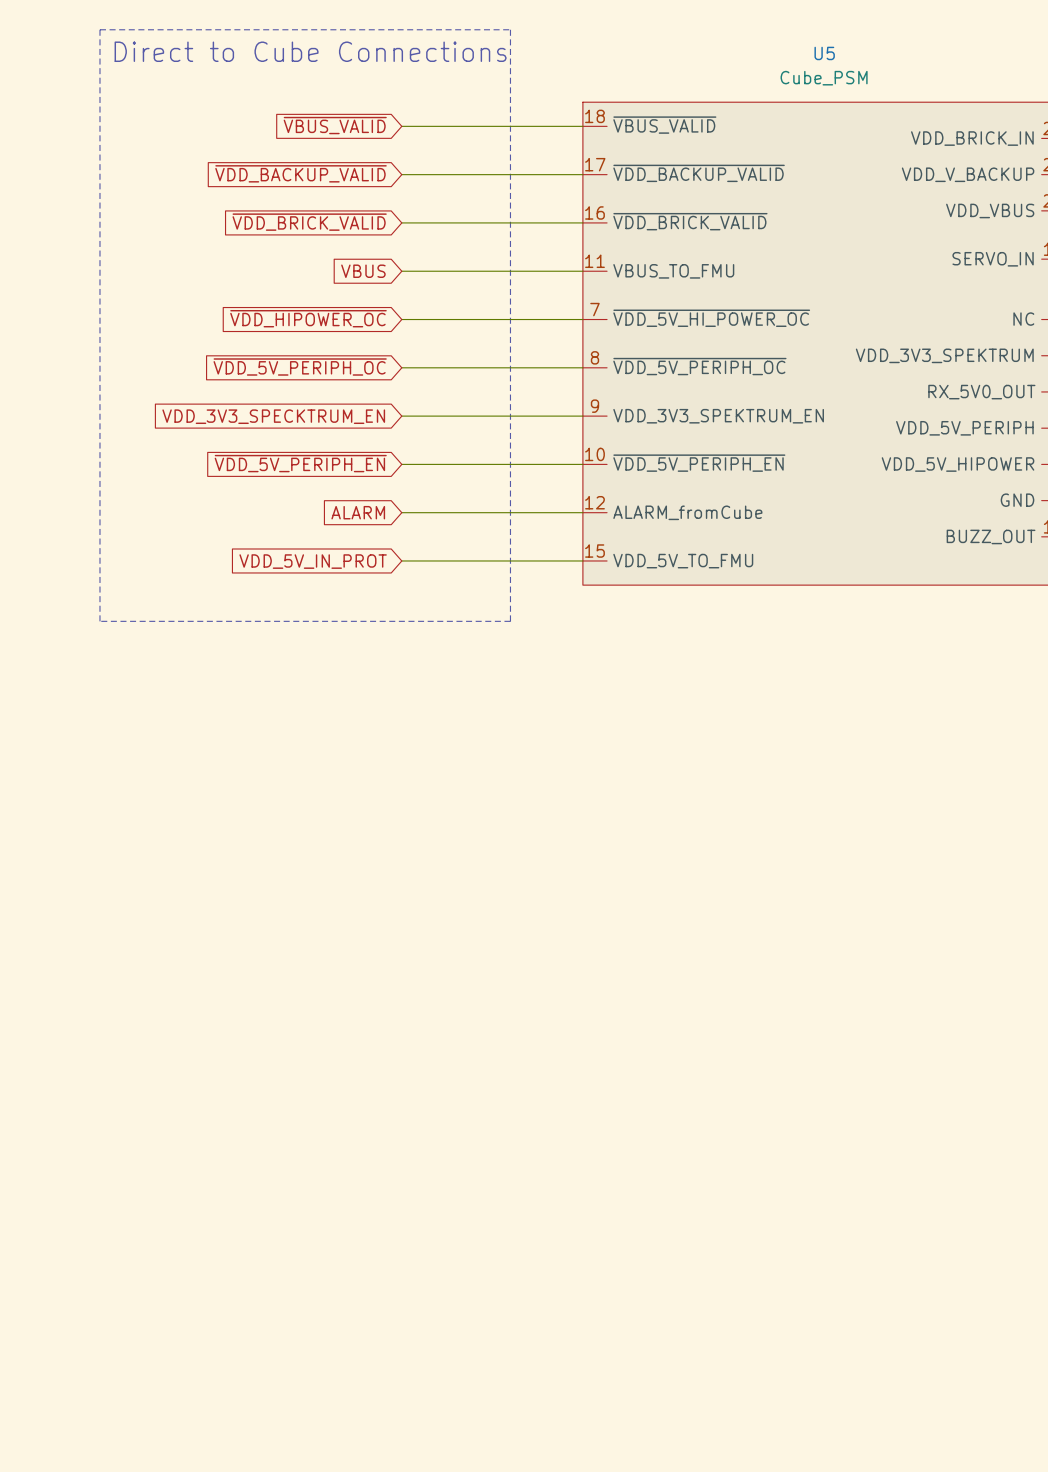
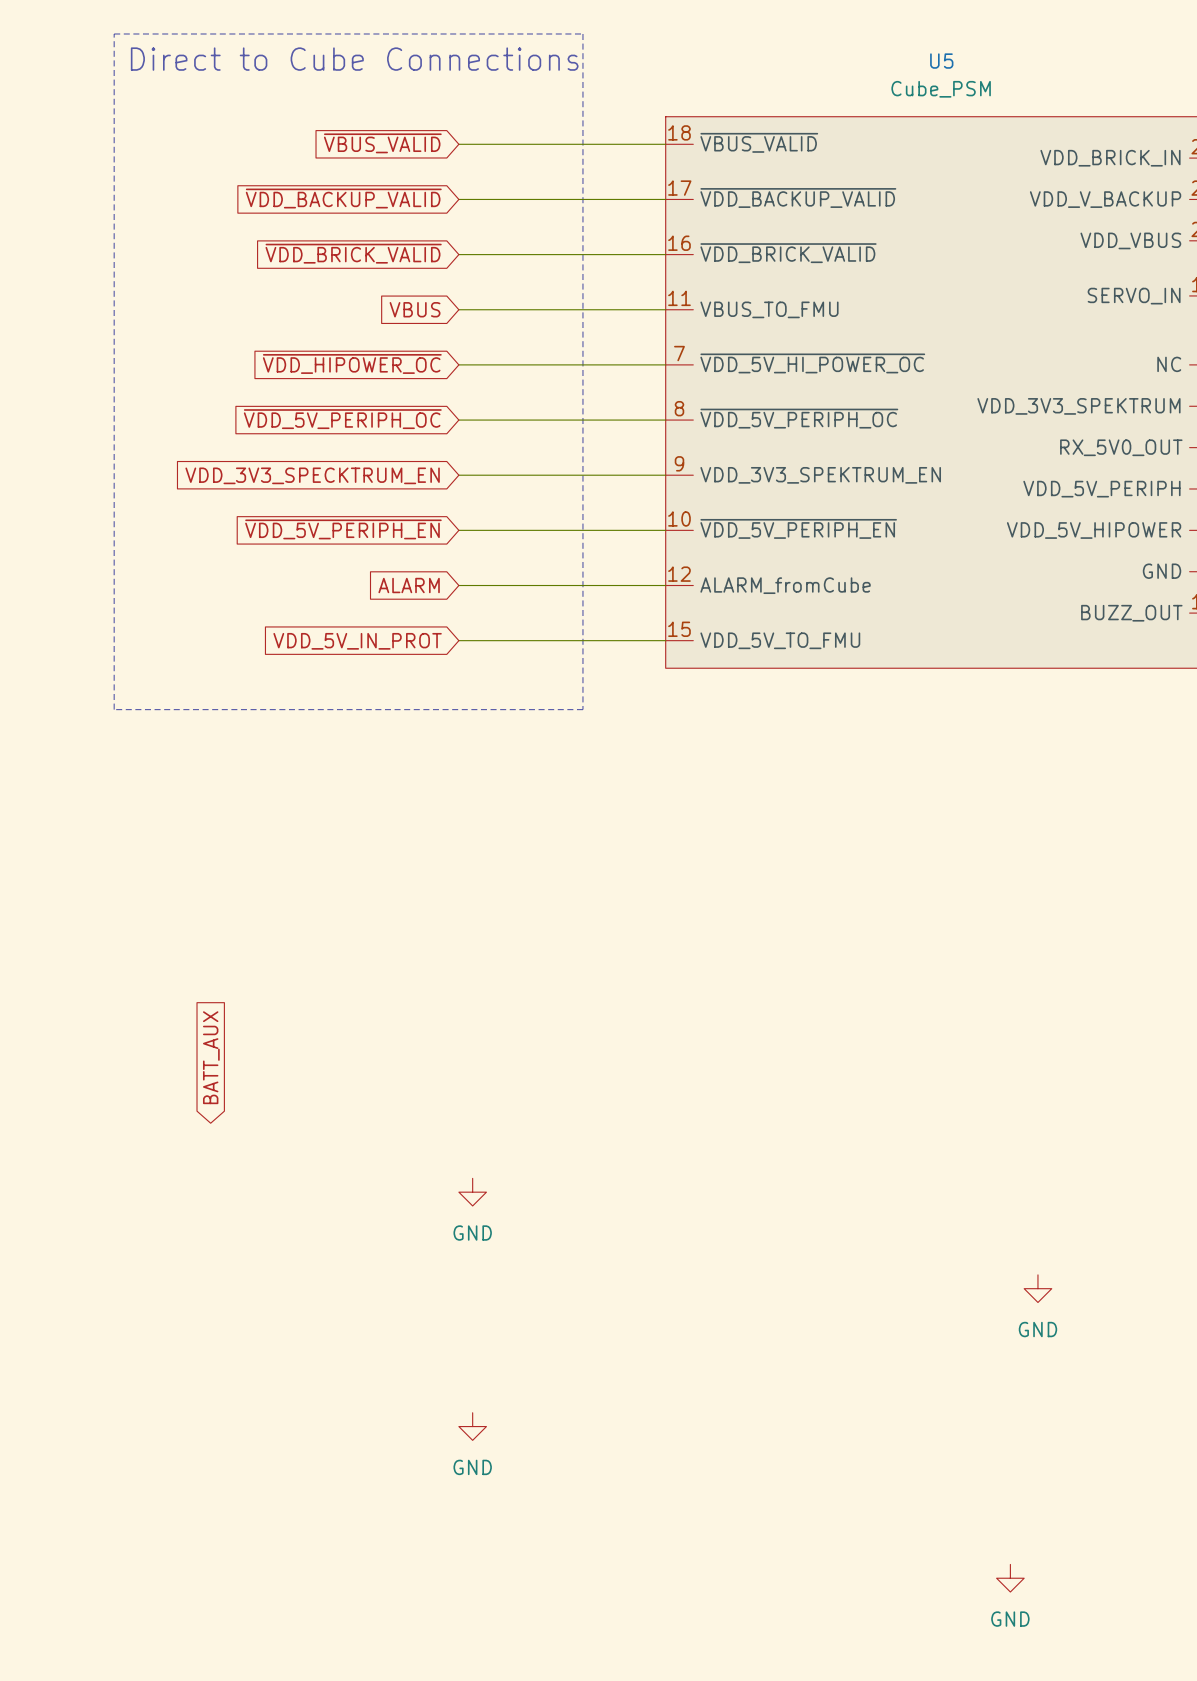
global label: none -> BATT_AUX (211, 1057)
power symbol: none -> GND (472, 1192)
power symbol: none -> GND (1037, 1288)
power symbol: none -> GND (472, 1426)
power symbol: none -> GND (1010, 1578)

